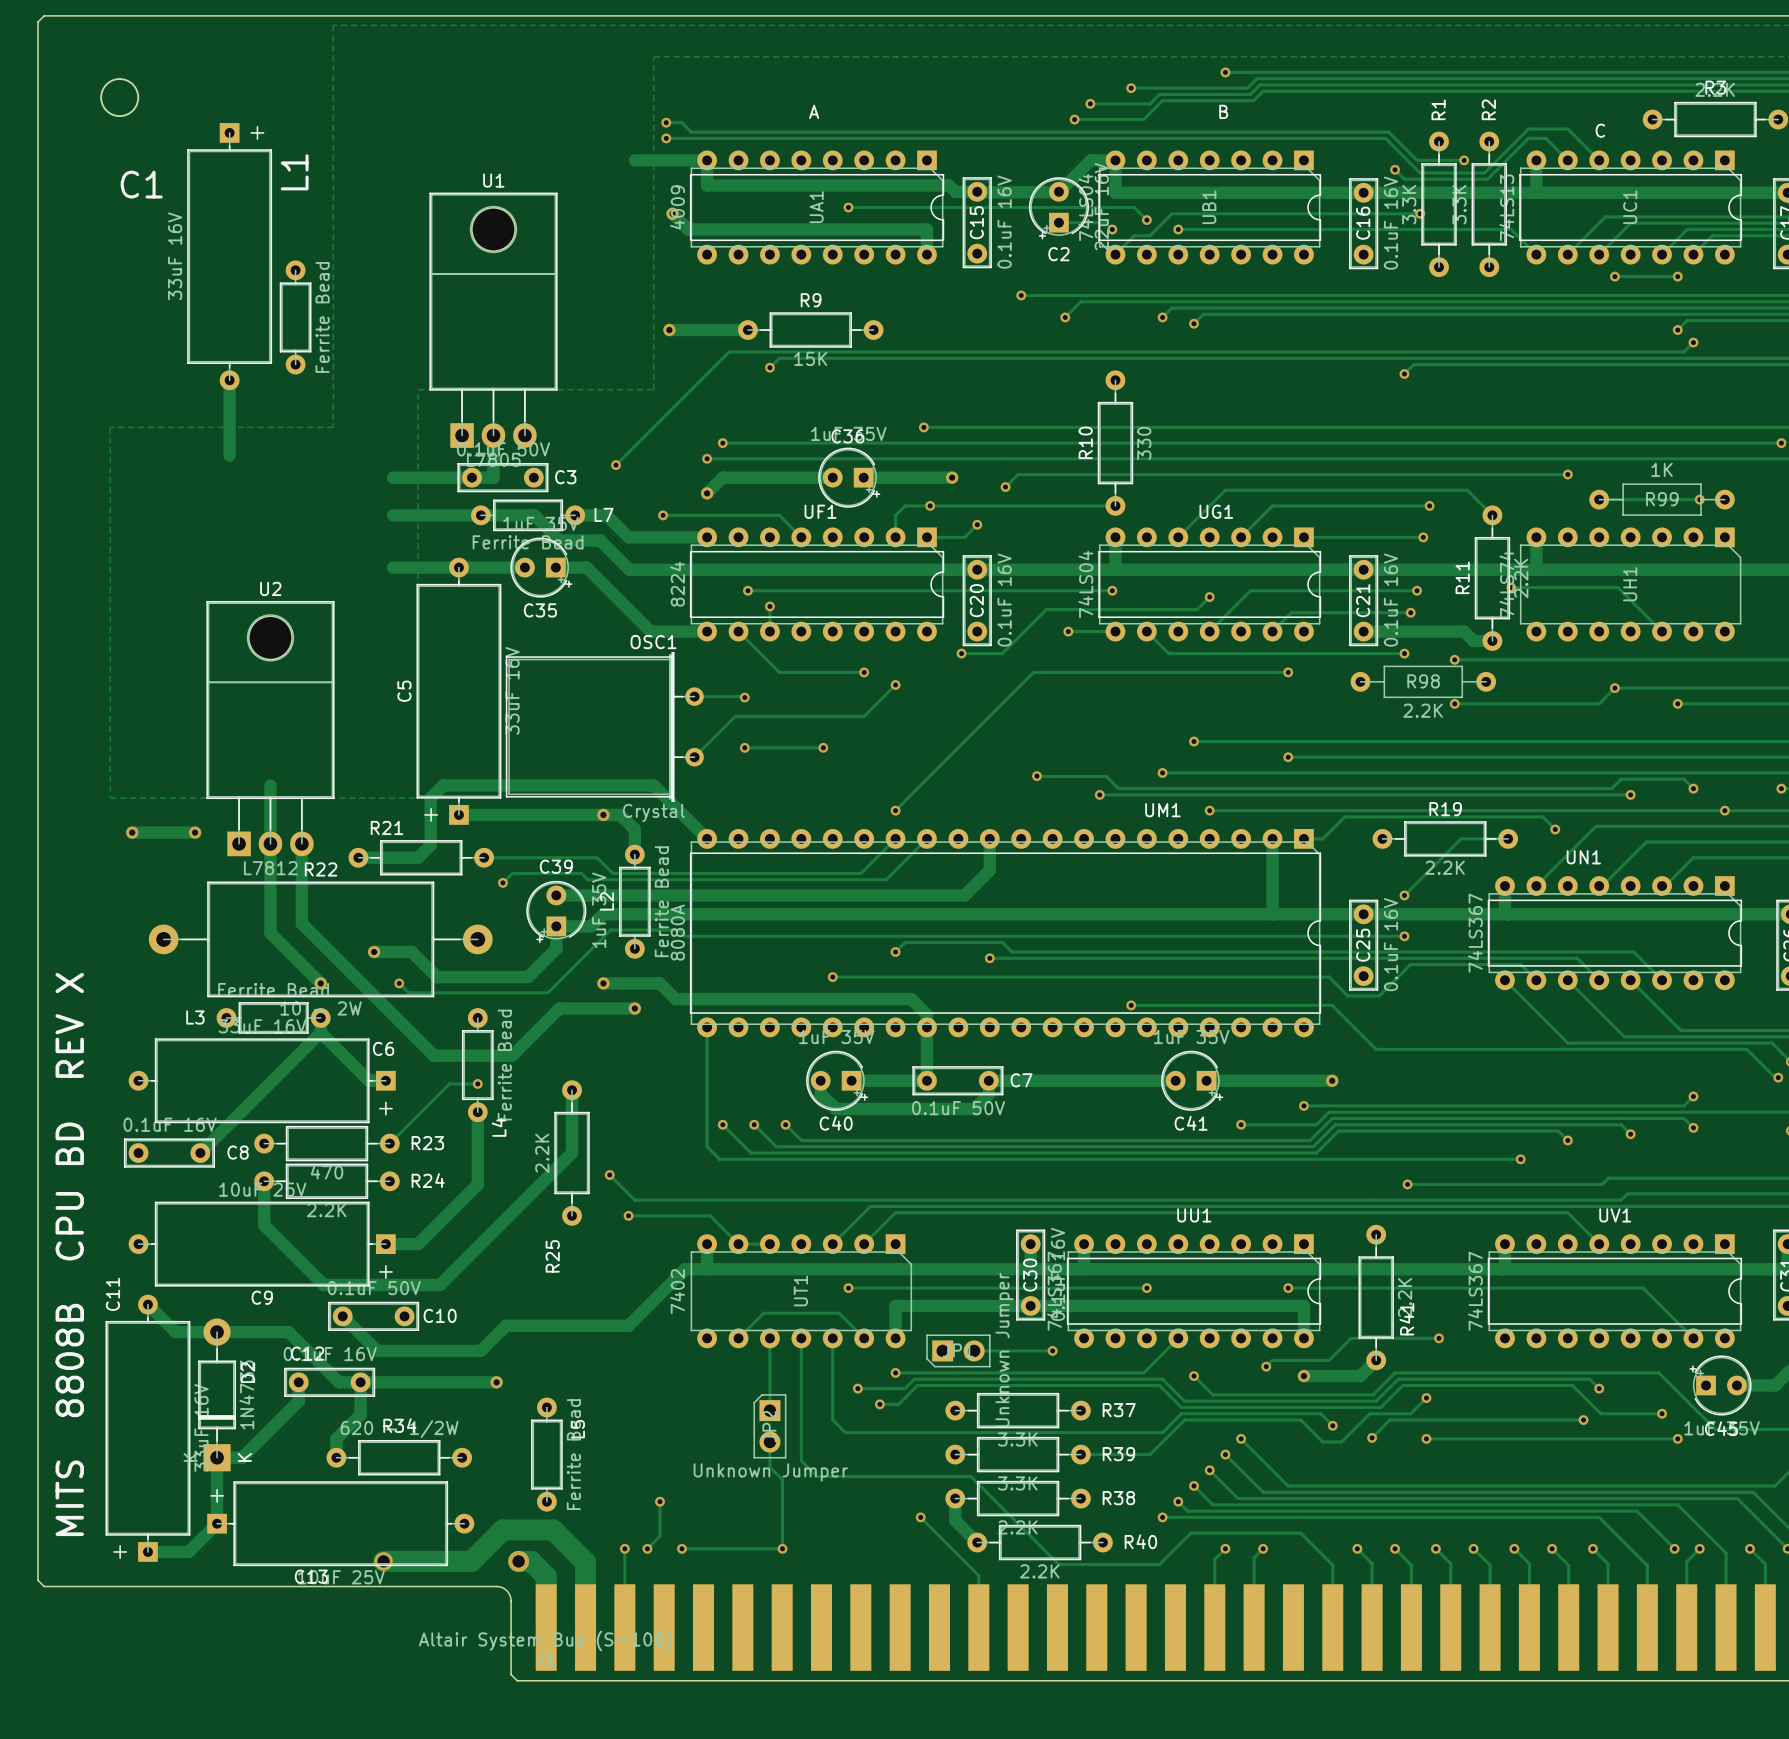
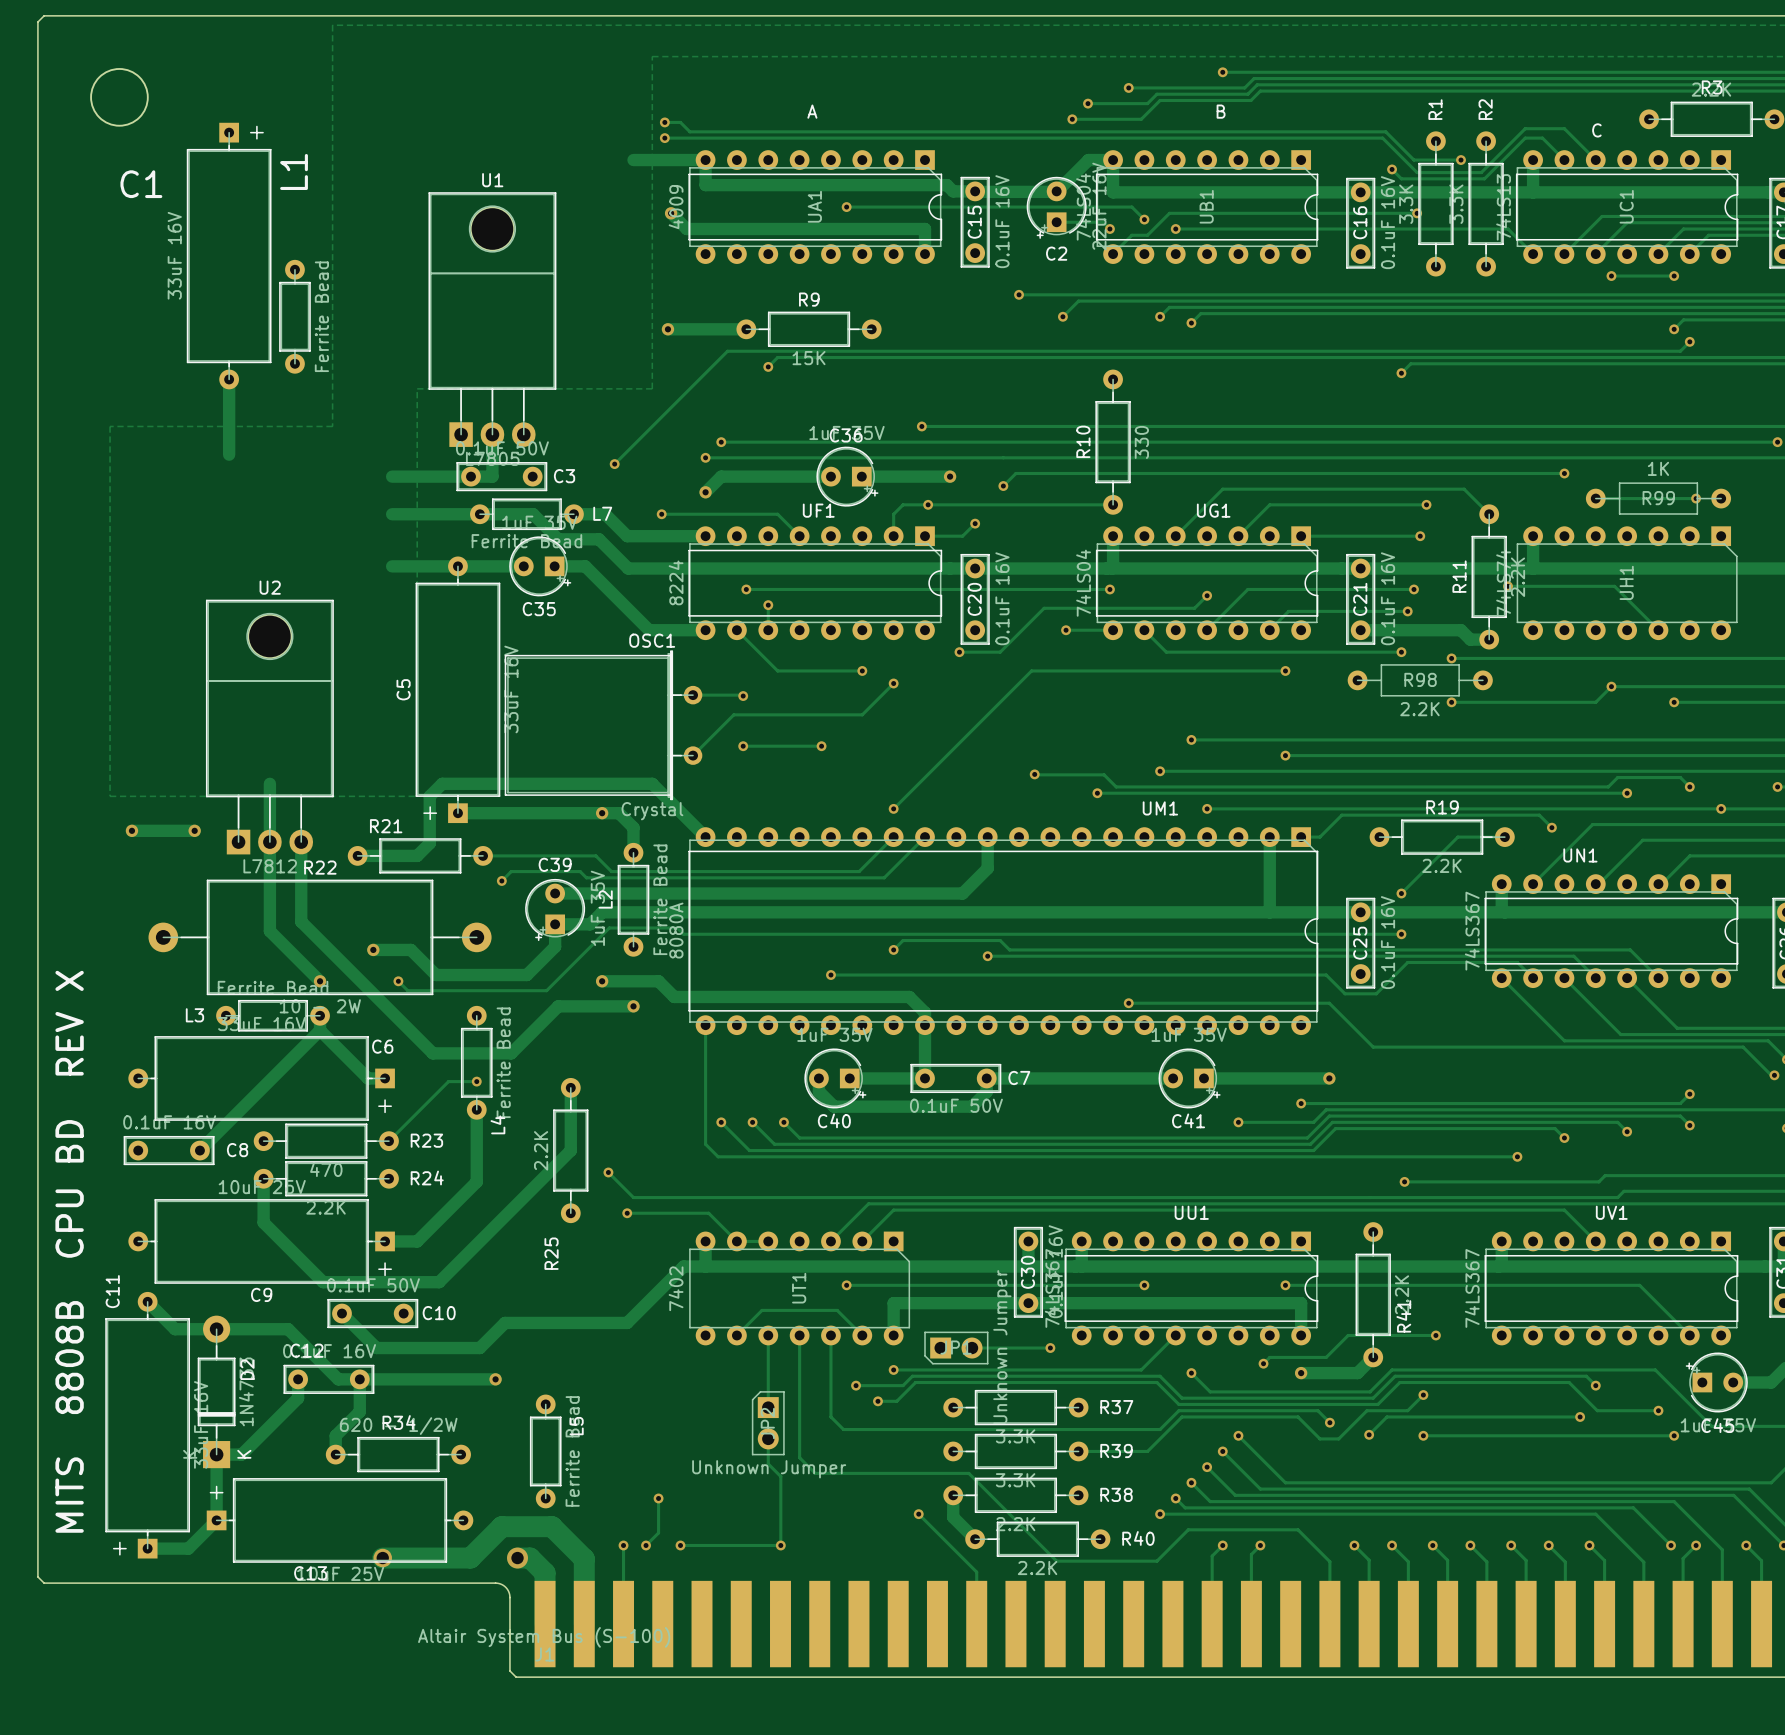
round board edge size: [100, 78, 140, 118] -> [90, 68, 149, 127]

